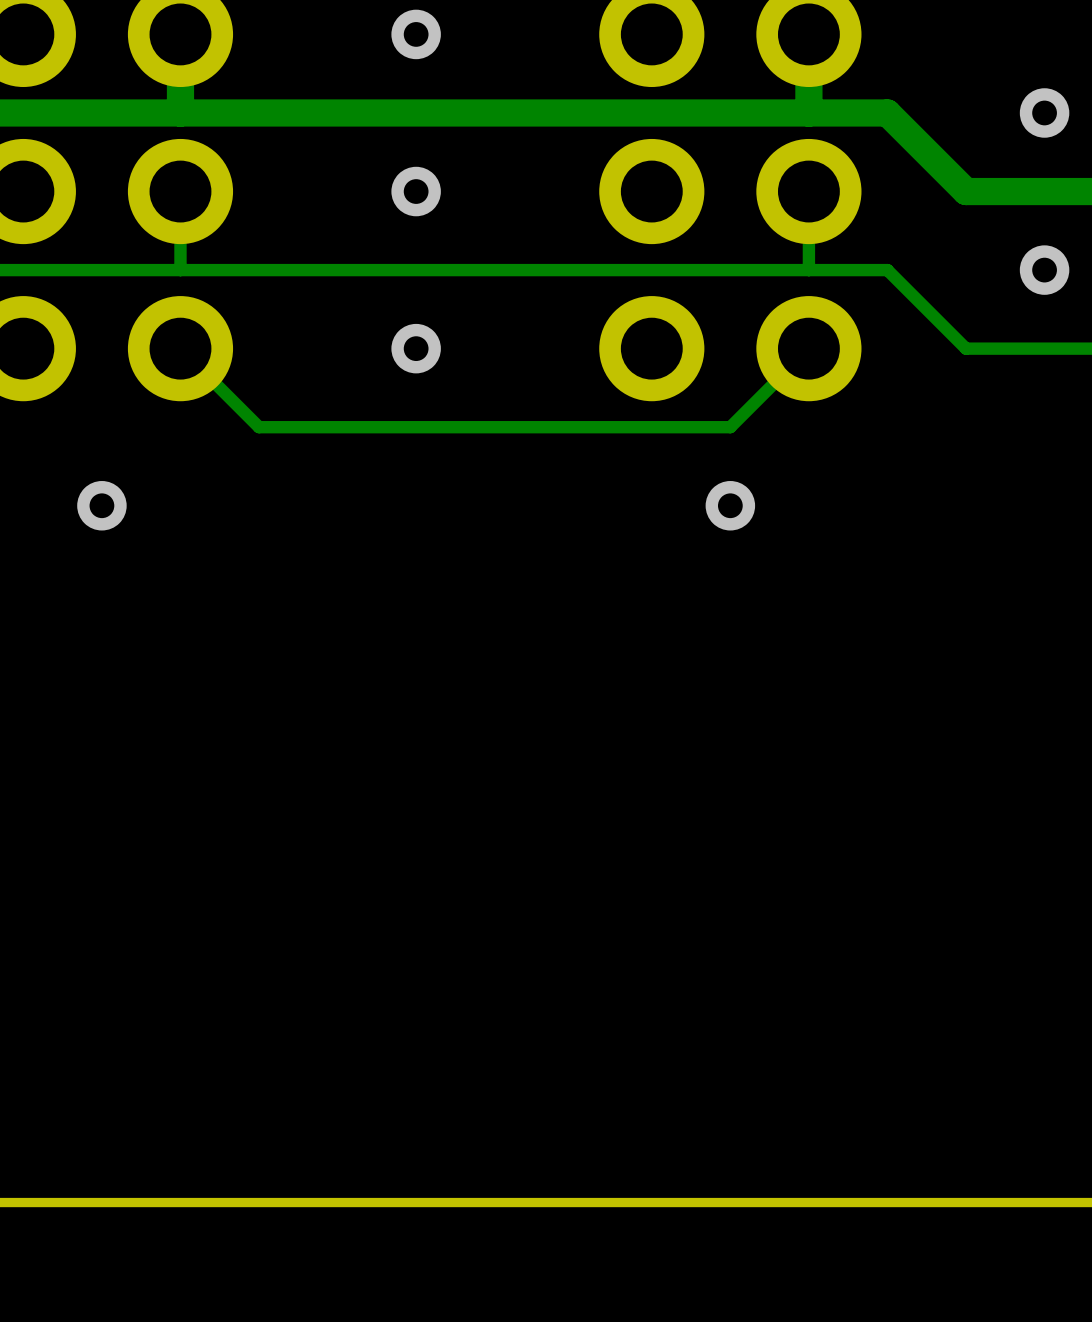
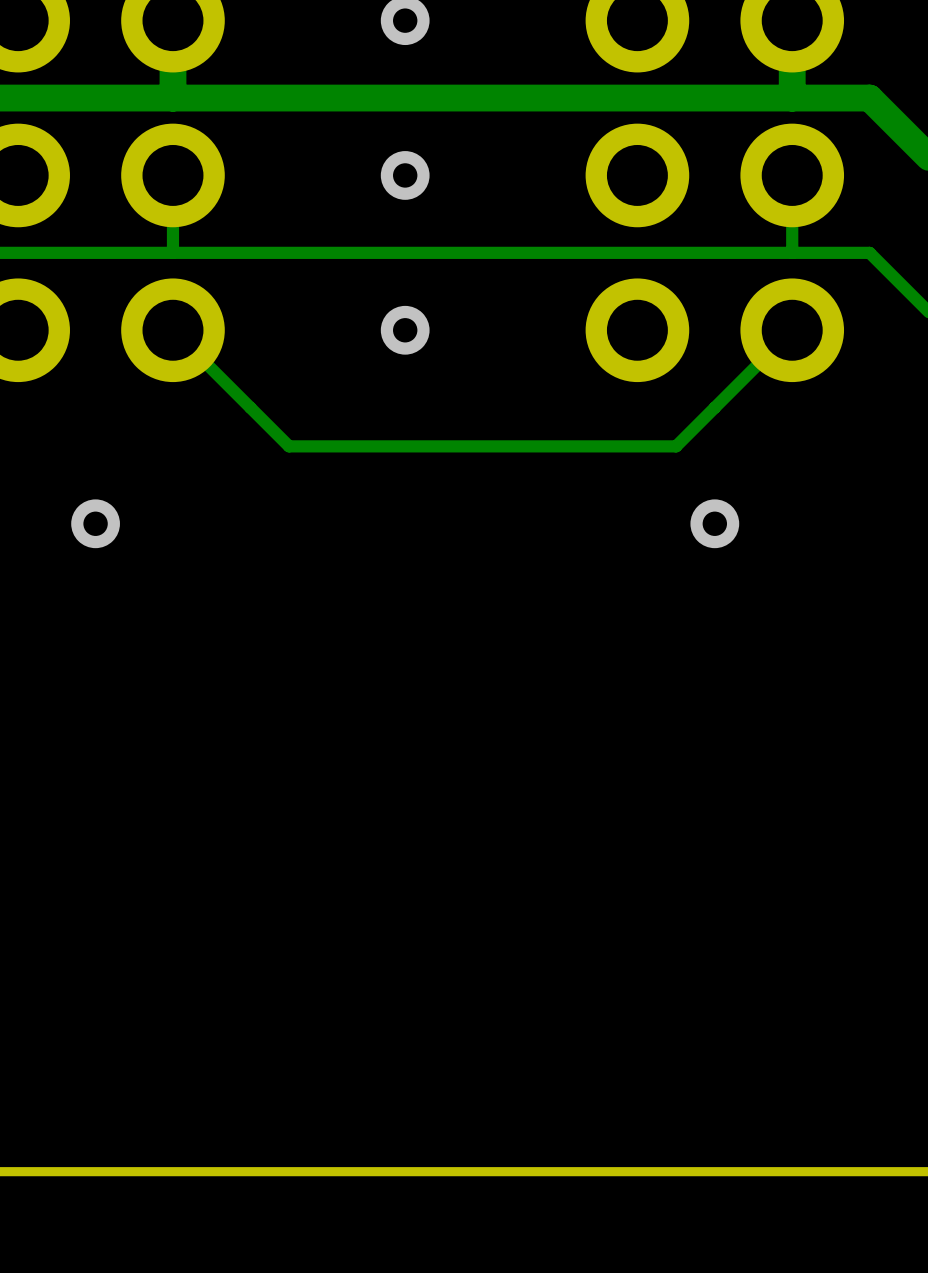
track: (730, 427) (259, 427) -> (714, 407) (676, 446) (289, 446) (250, 407)
via position: (101, 505) -> (95, 523)
via position: (730, 505) -> (714, 523)

